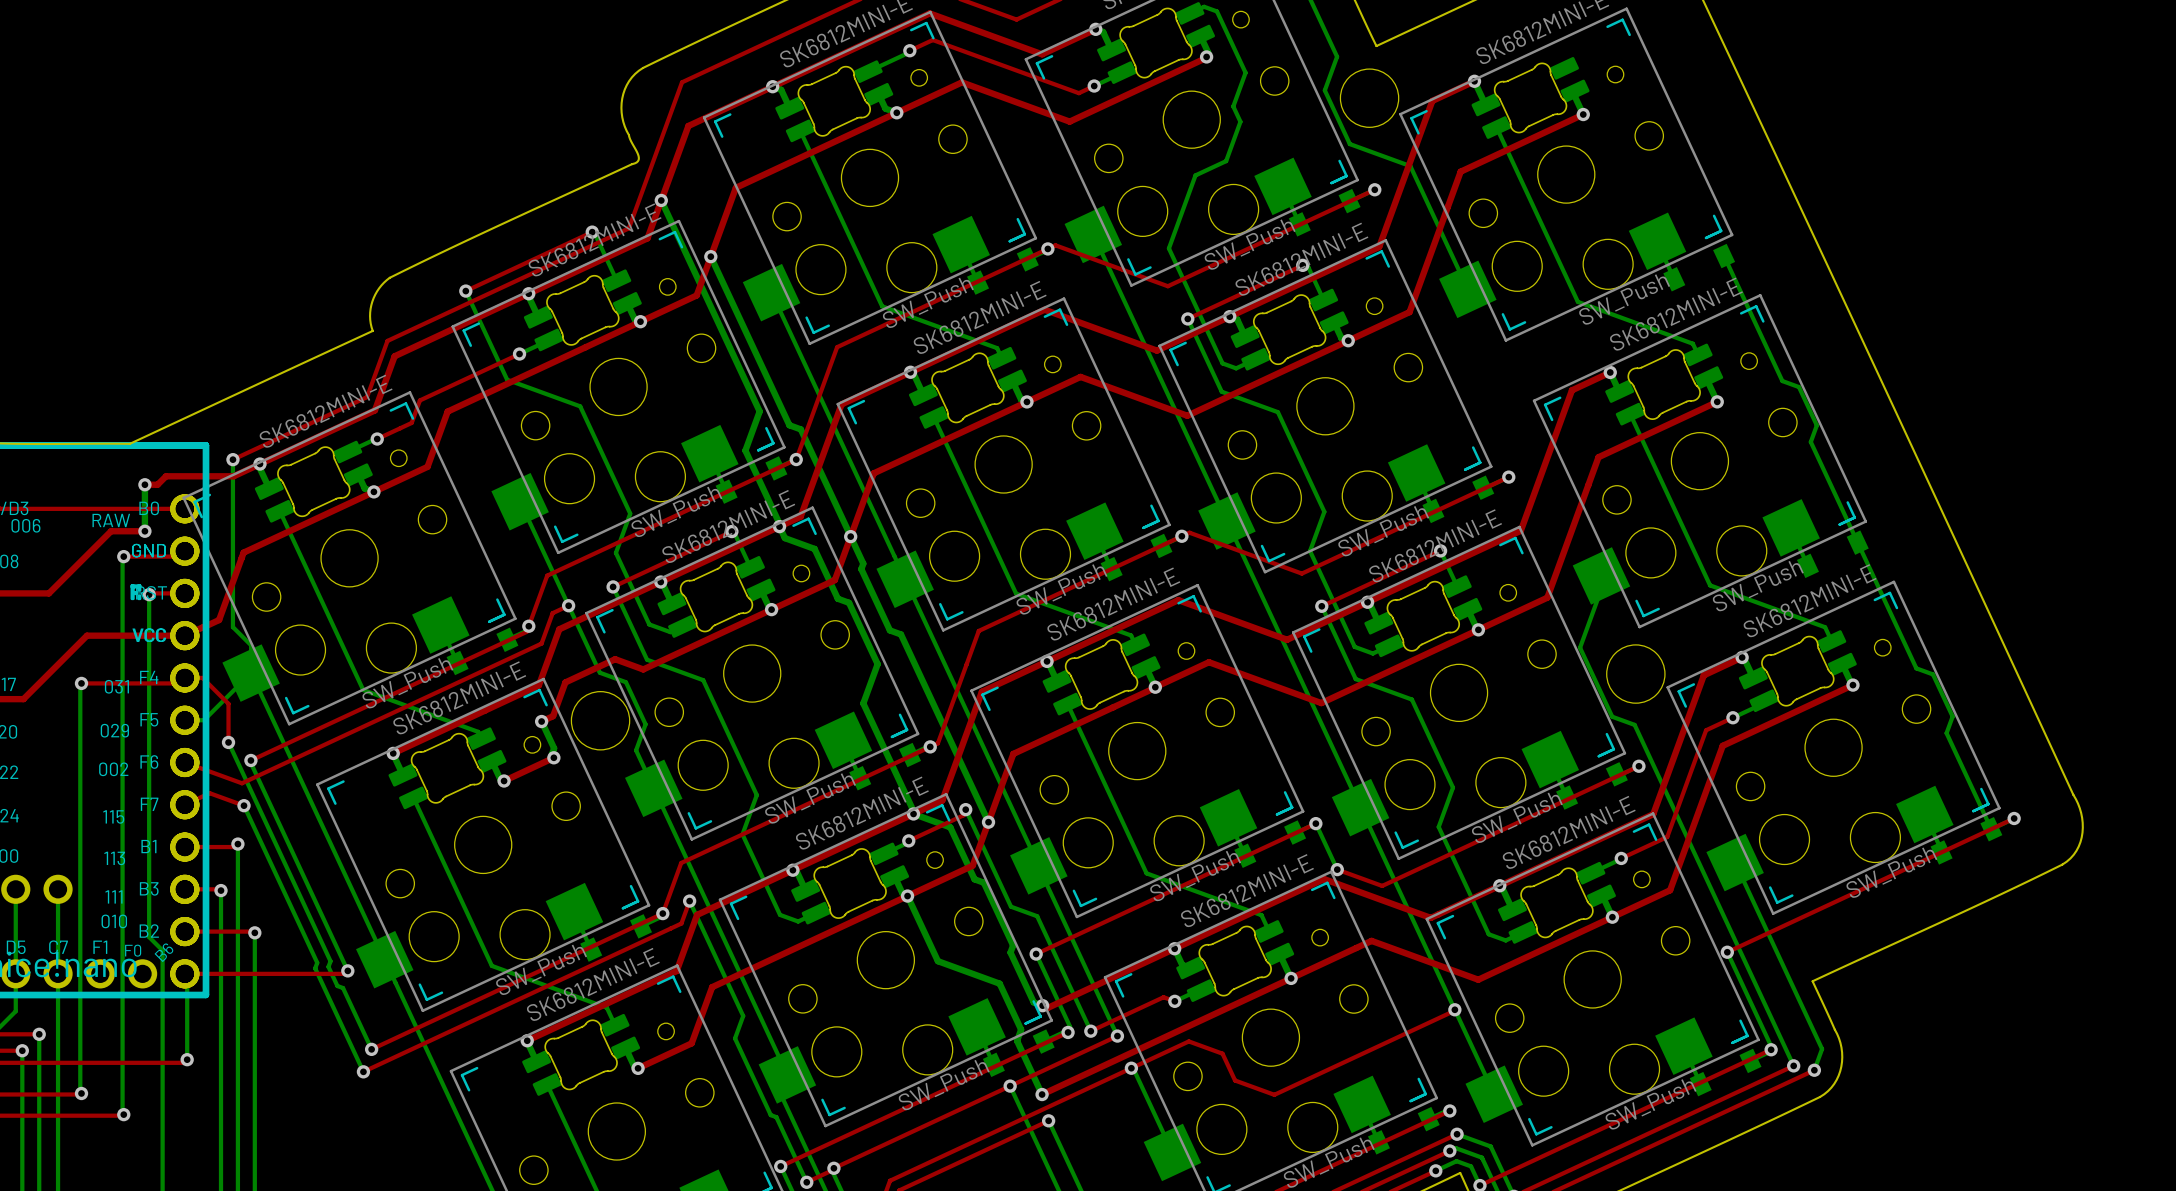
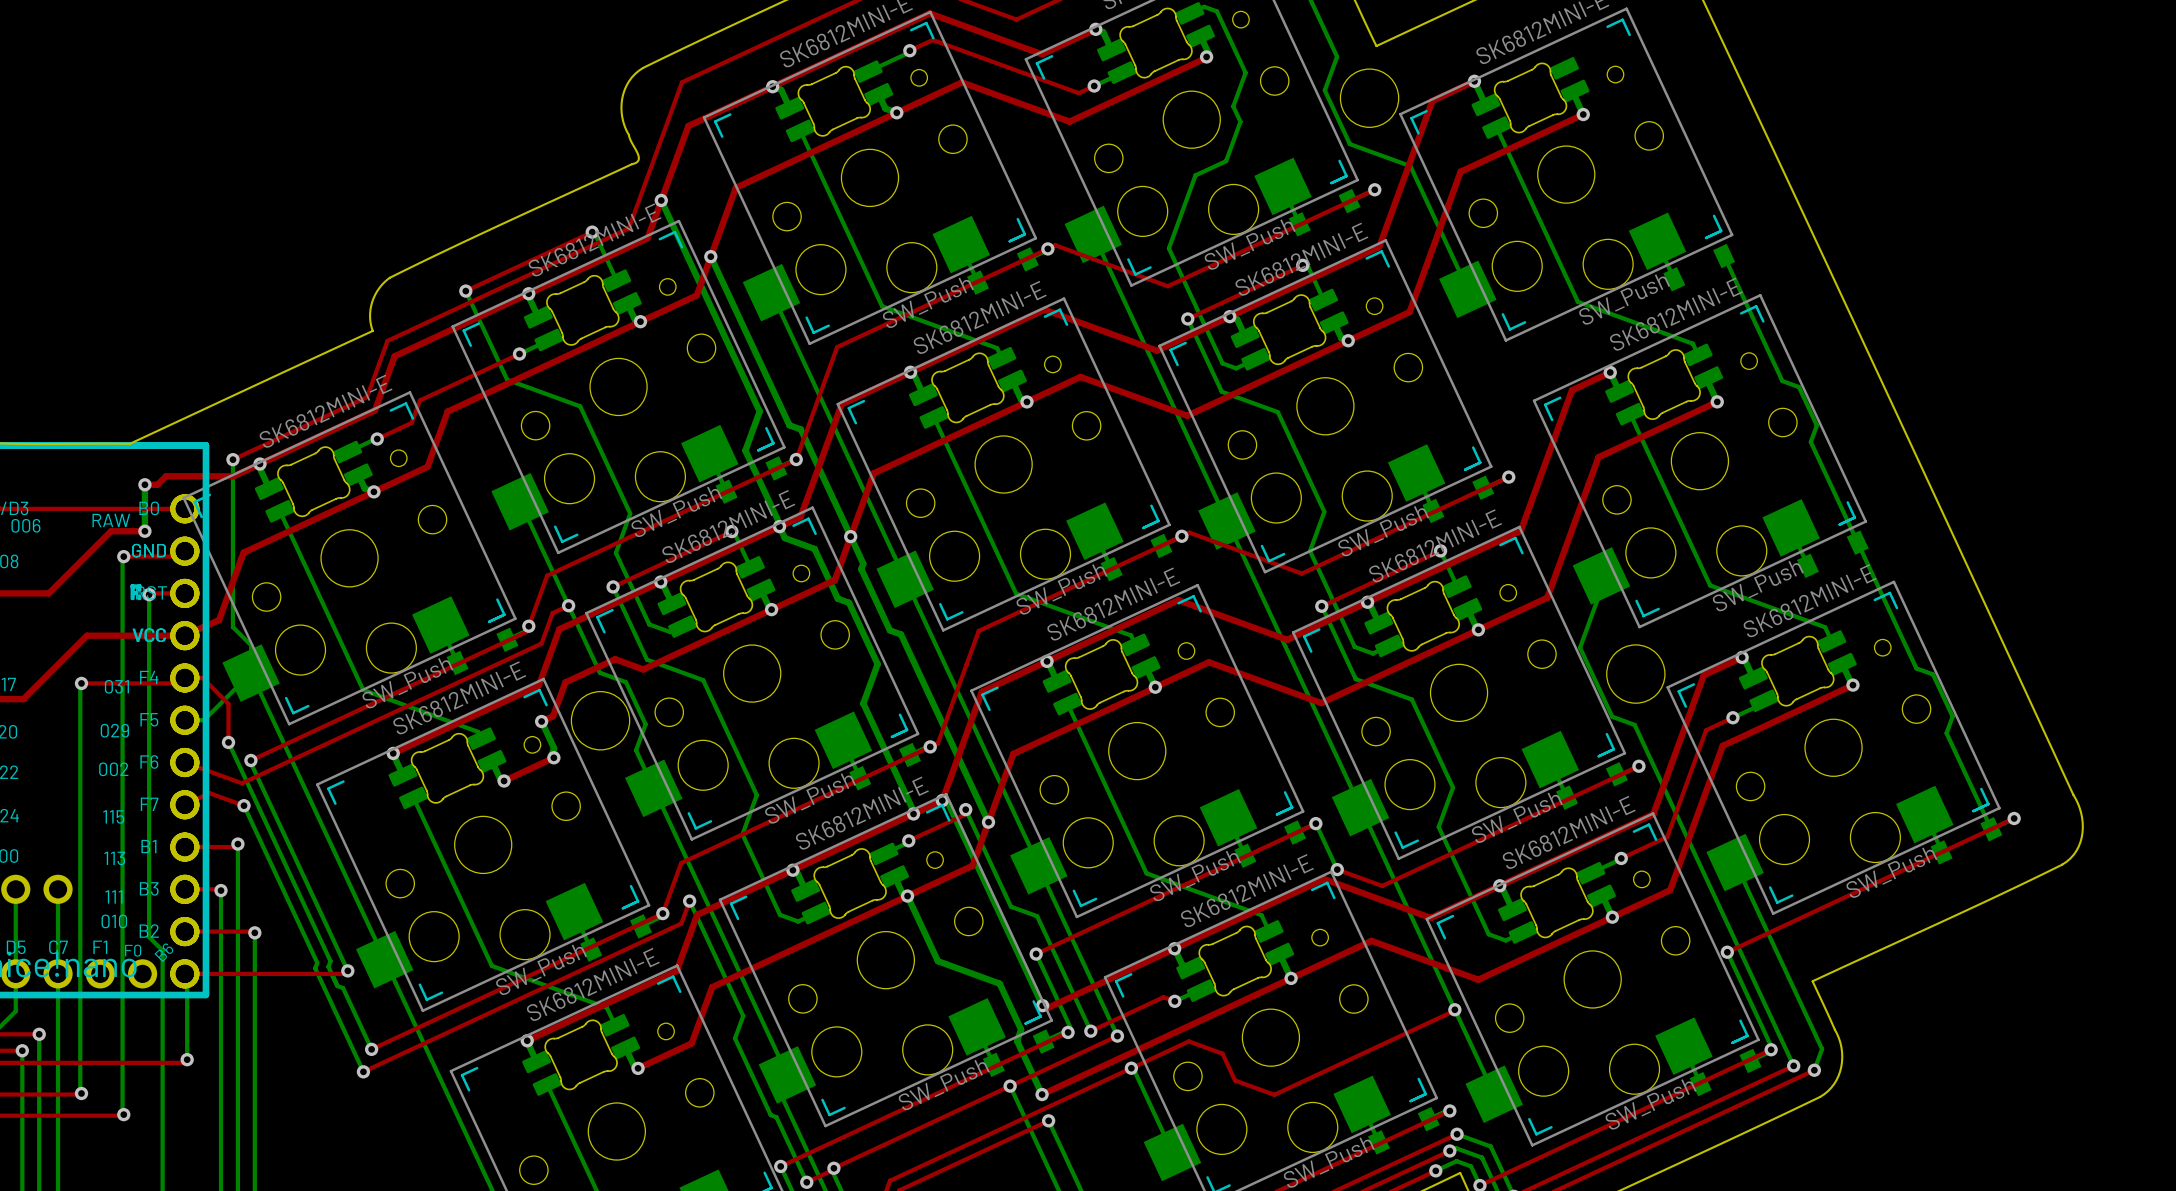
via: none -> (942, 800)
bottom track: (913, 813) (950, 827) (974, 879) (983, 882) (1013, 945) (1010, 952) (1033, 1002) (1042, 1005) -> (942, 800) (947, 802) (1042, 1005)

